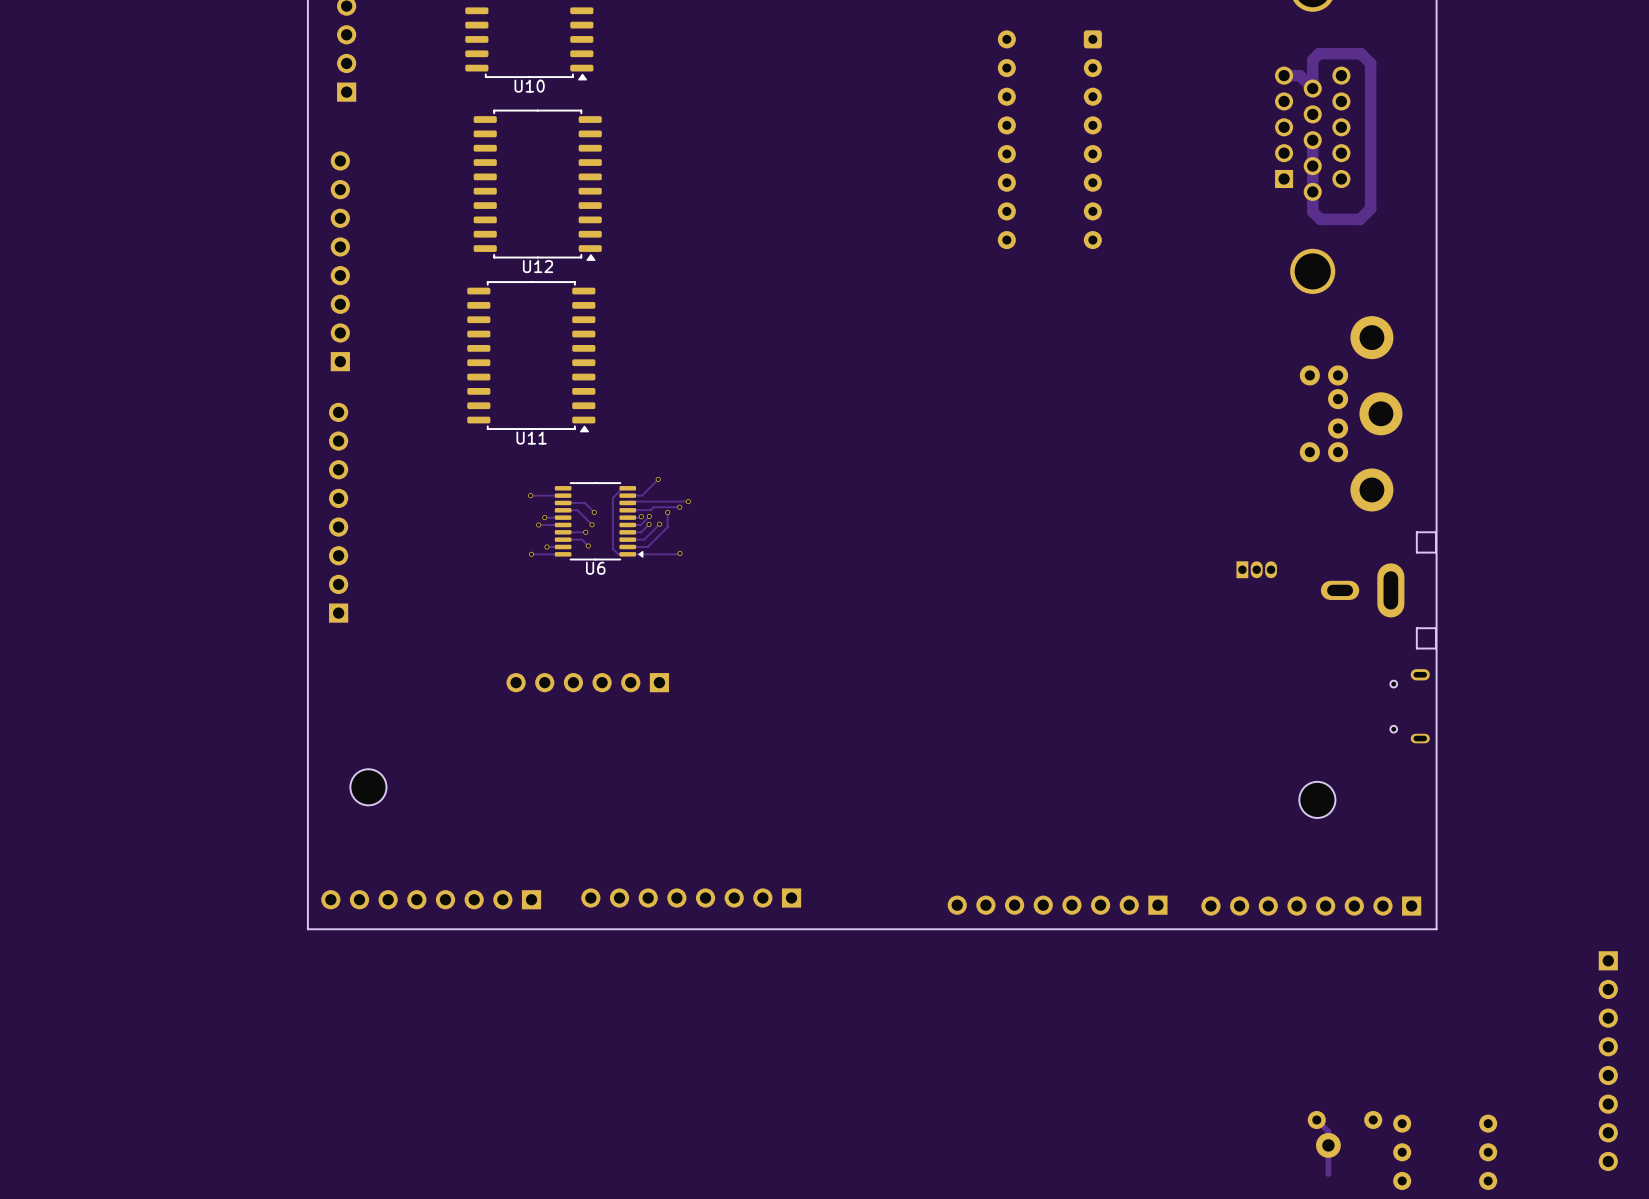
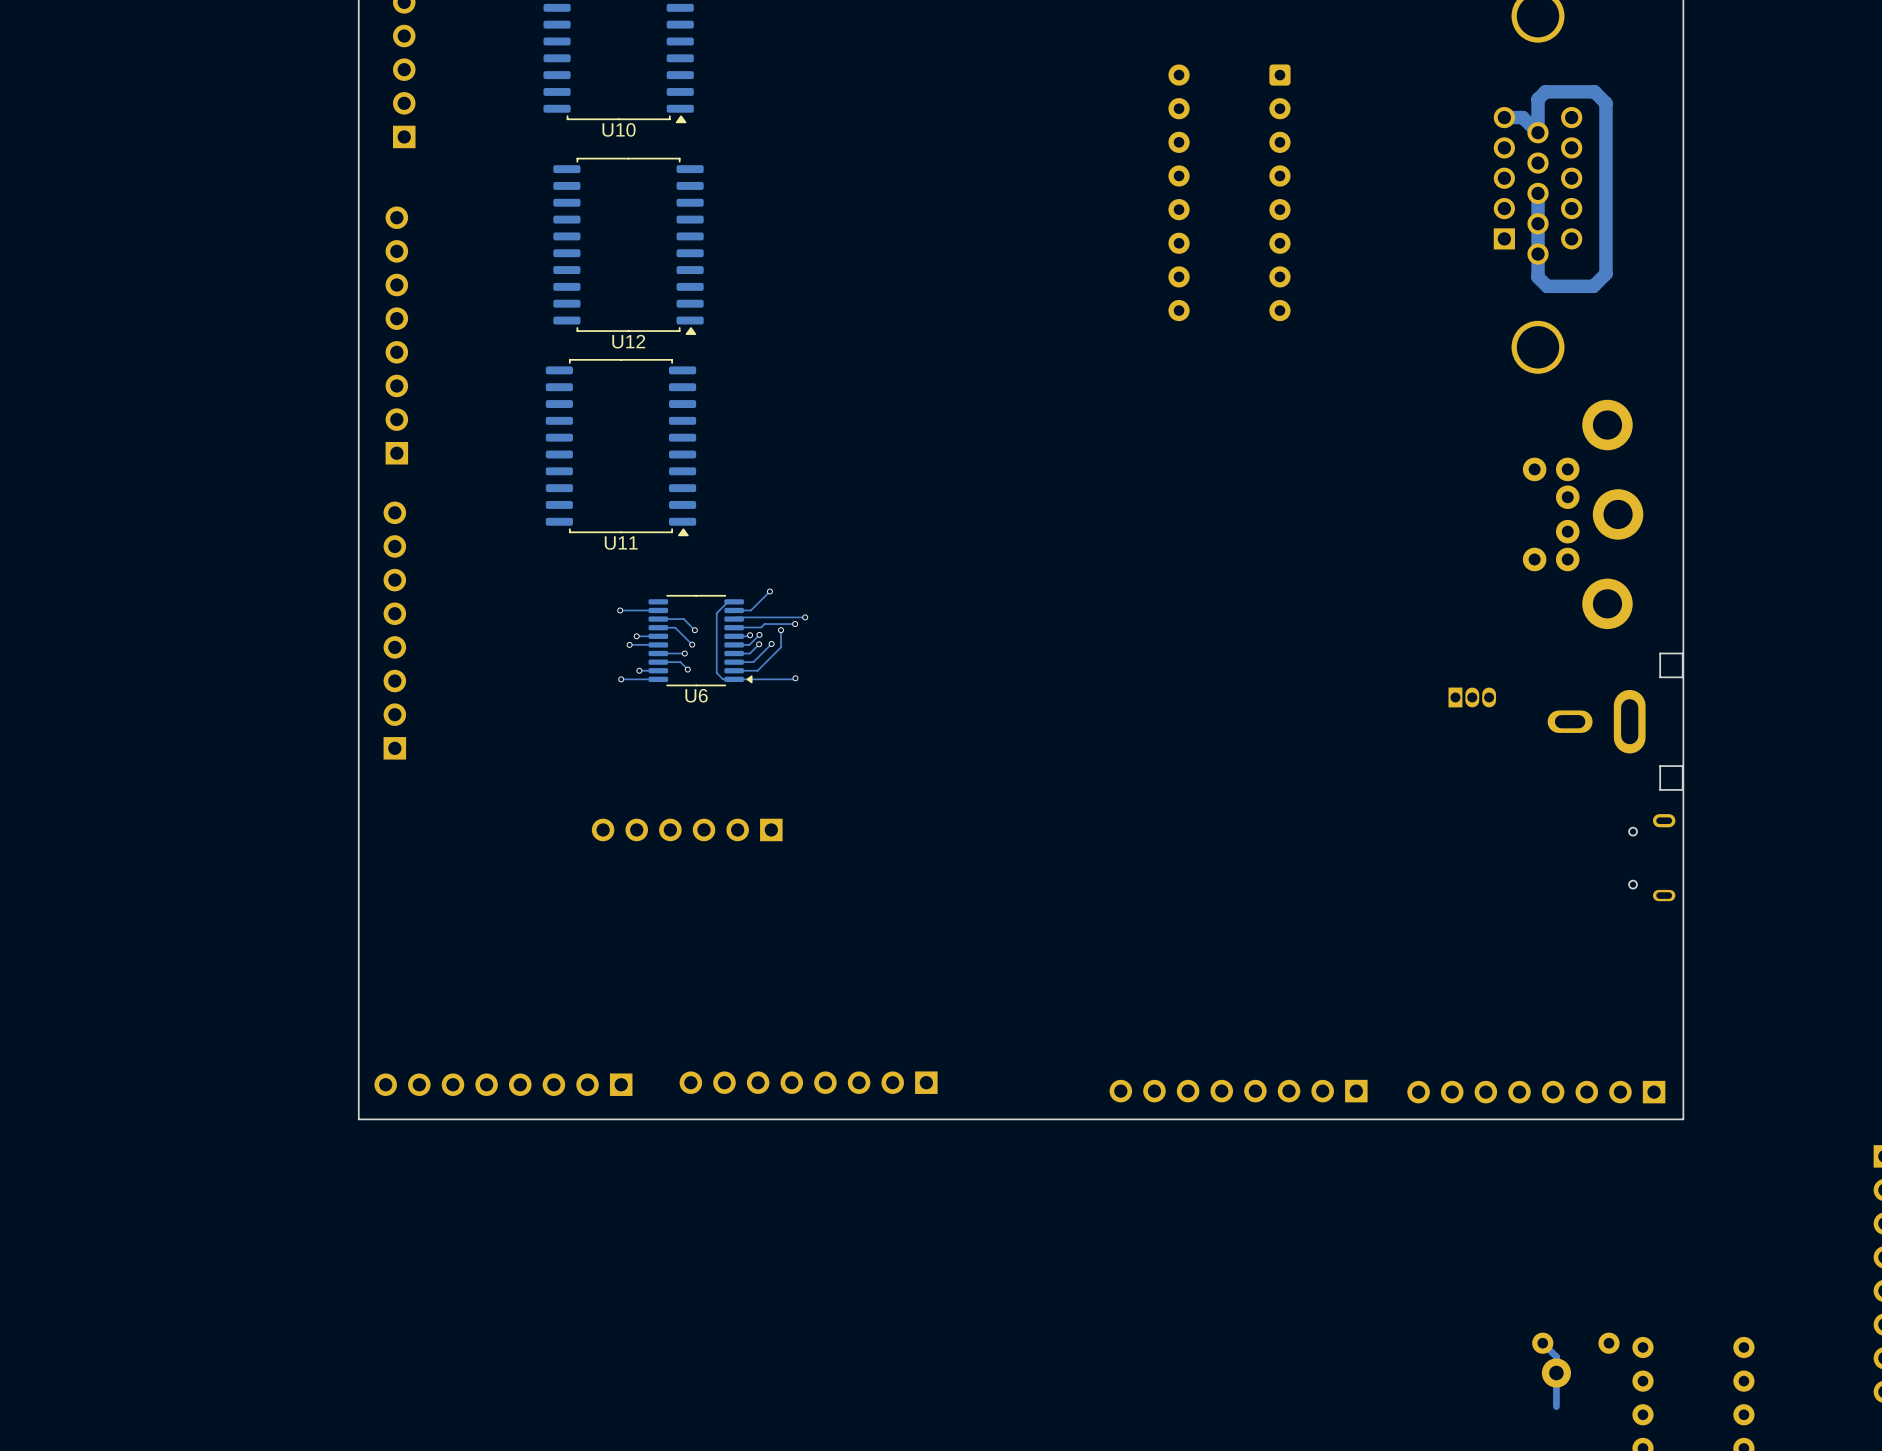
part: (368, 787) -> none
part: (1317, 799) -> none

